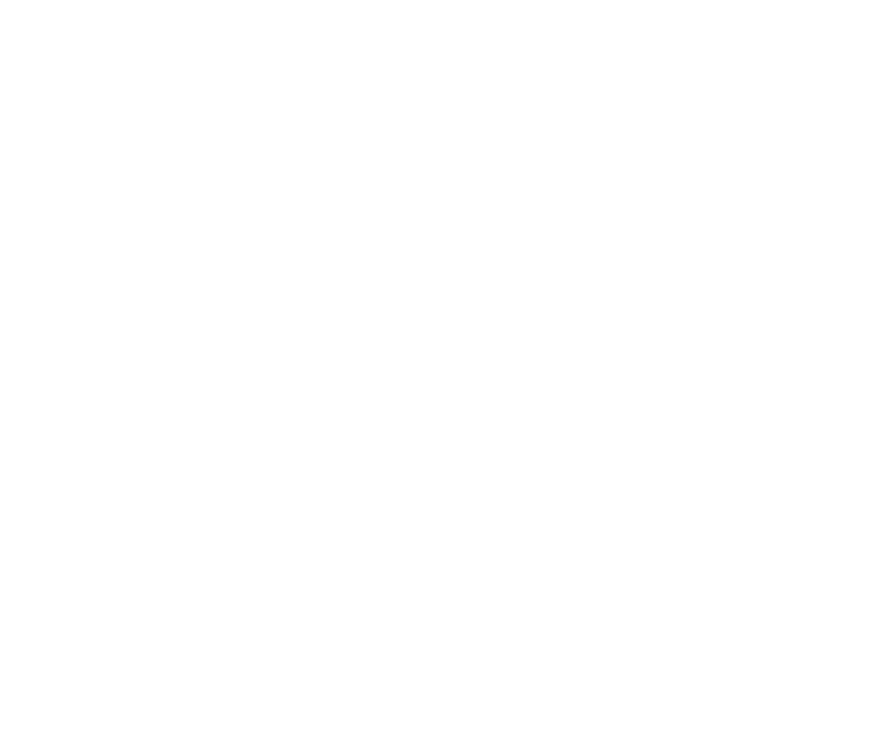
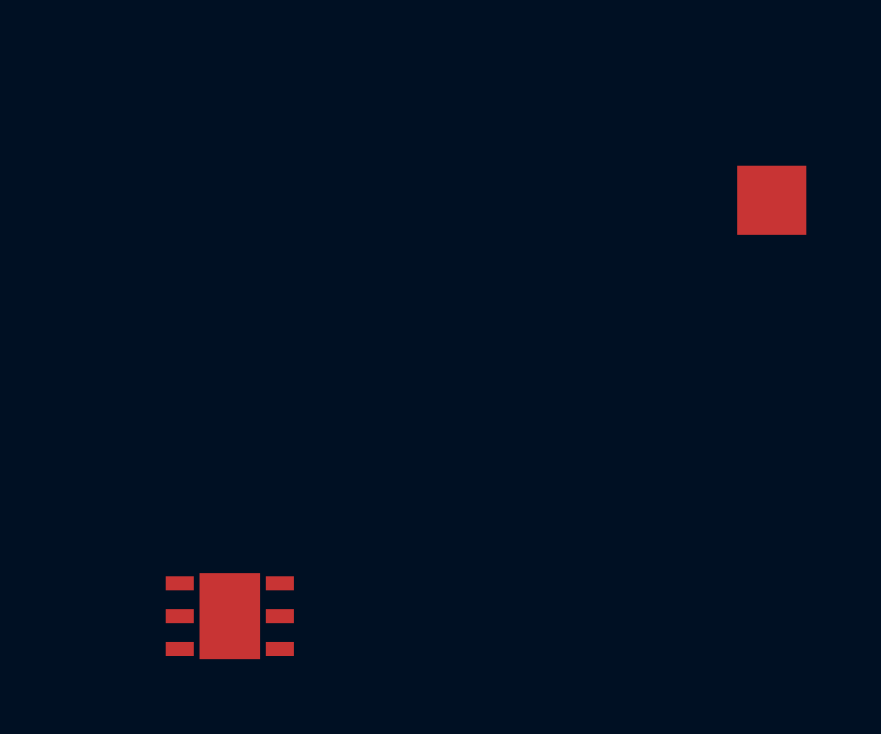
part: none -> (771, 200)
part: none -> (229, 616)

